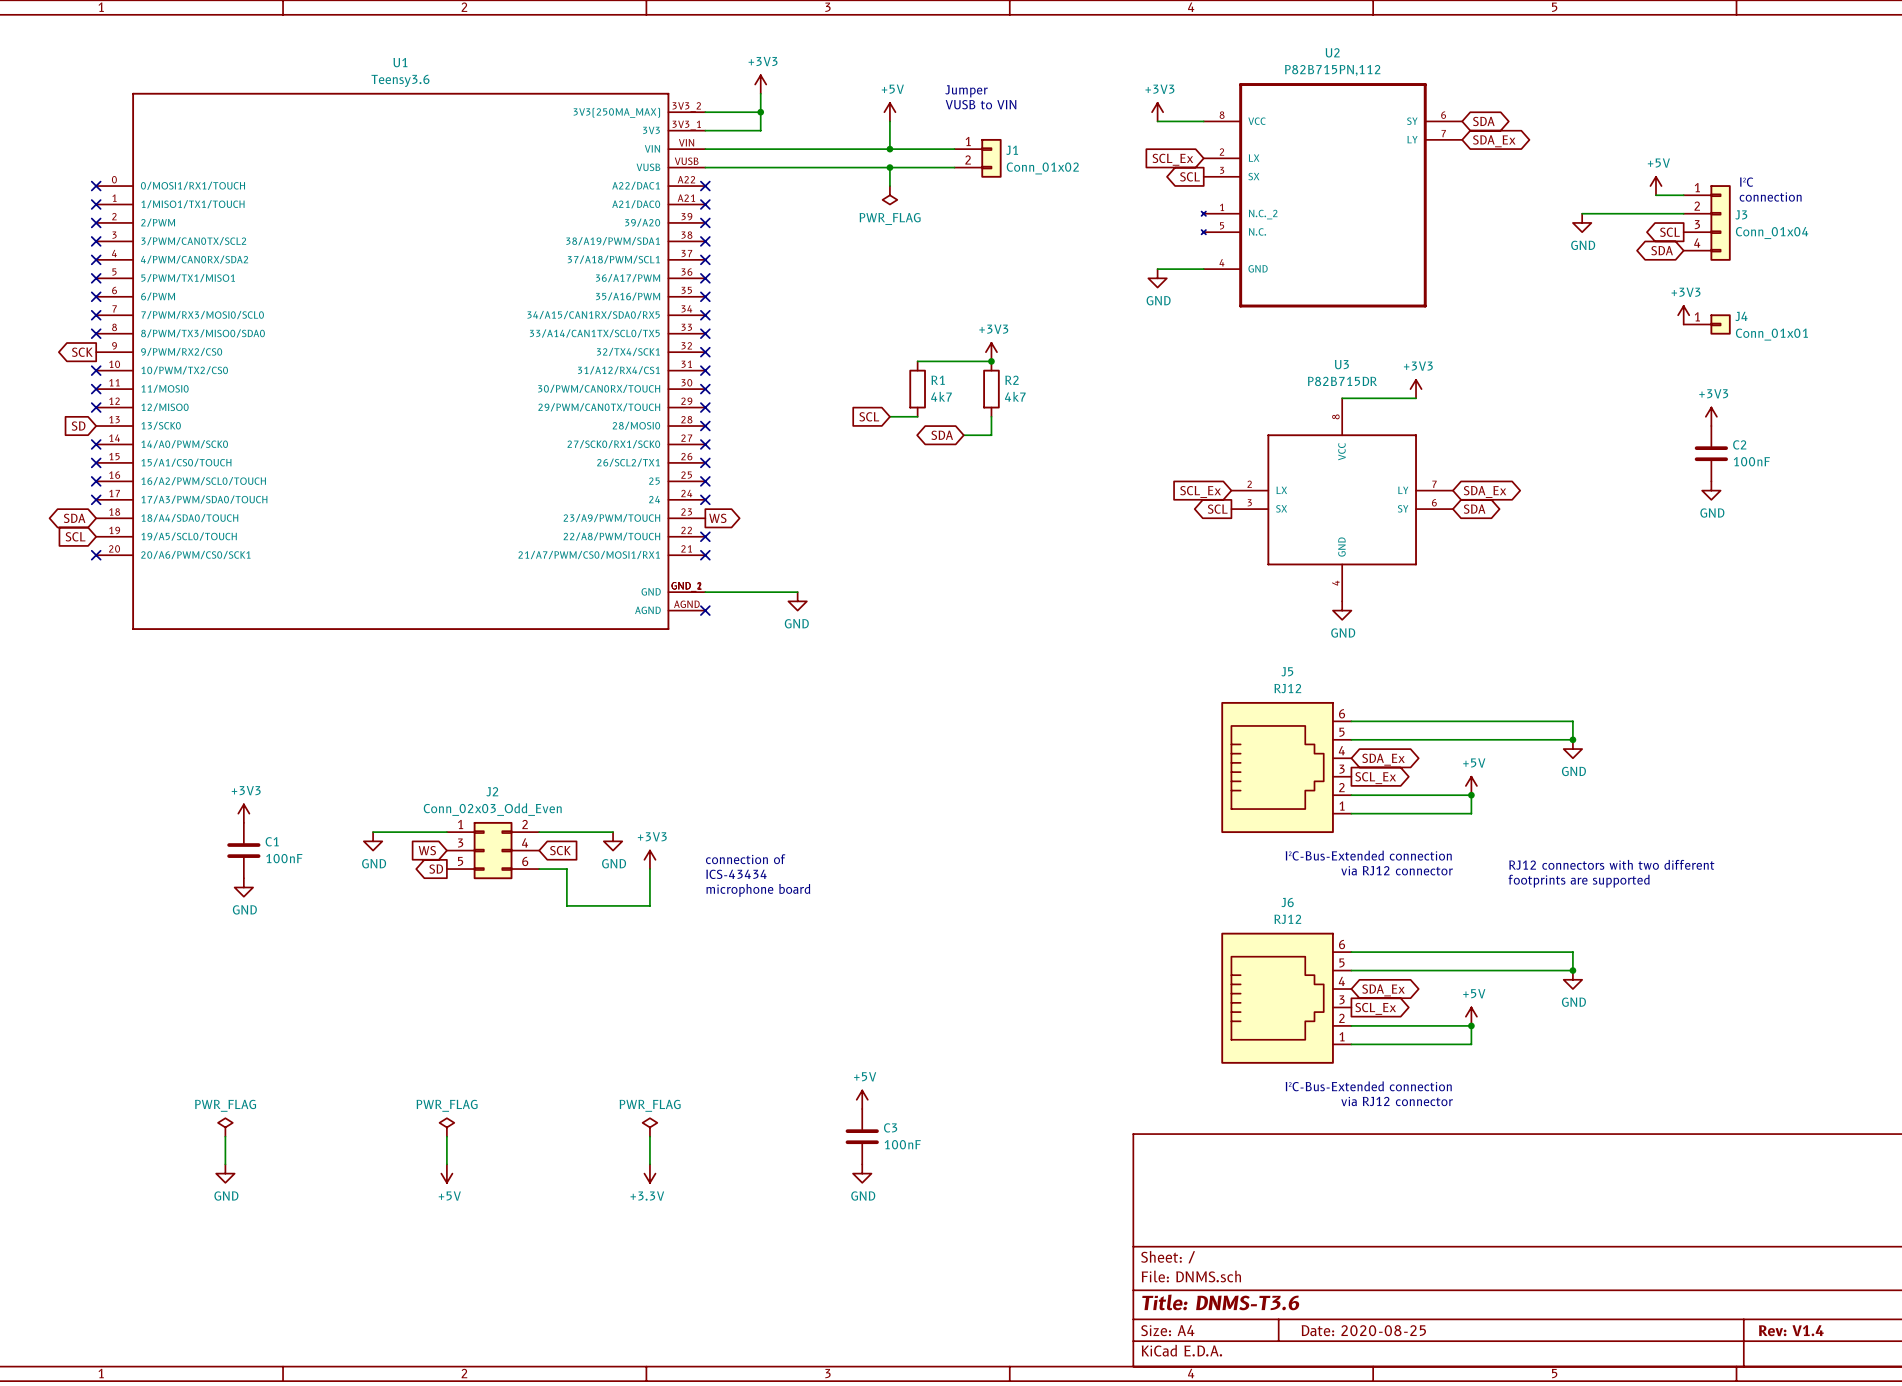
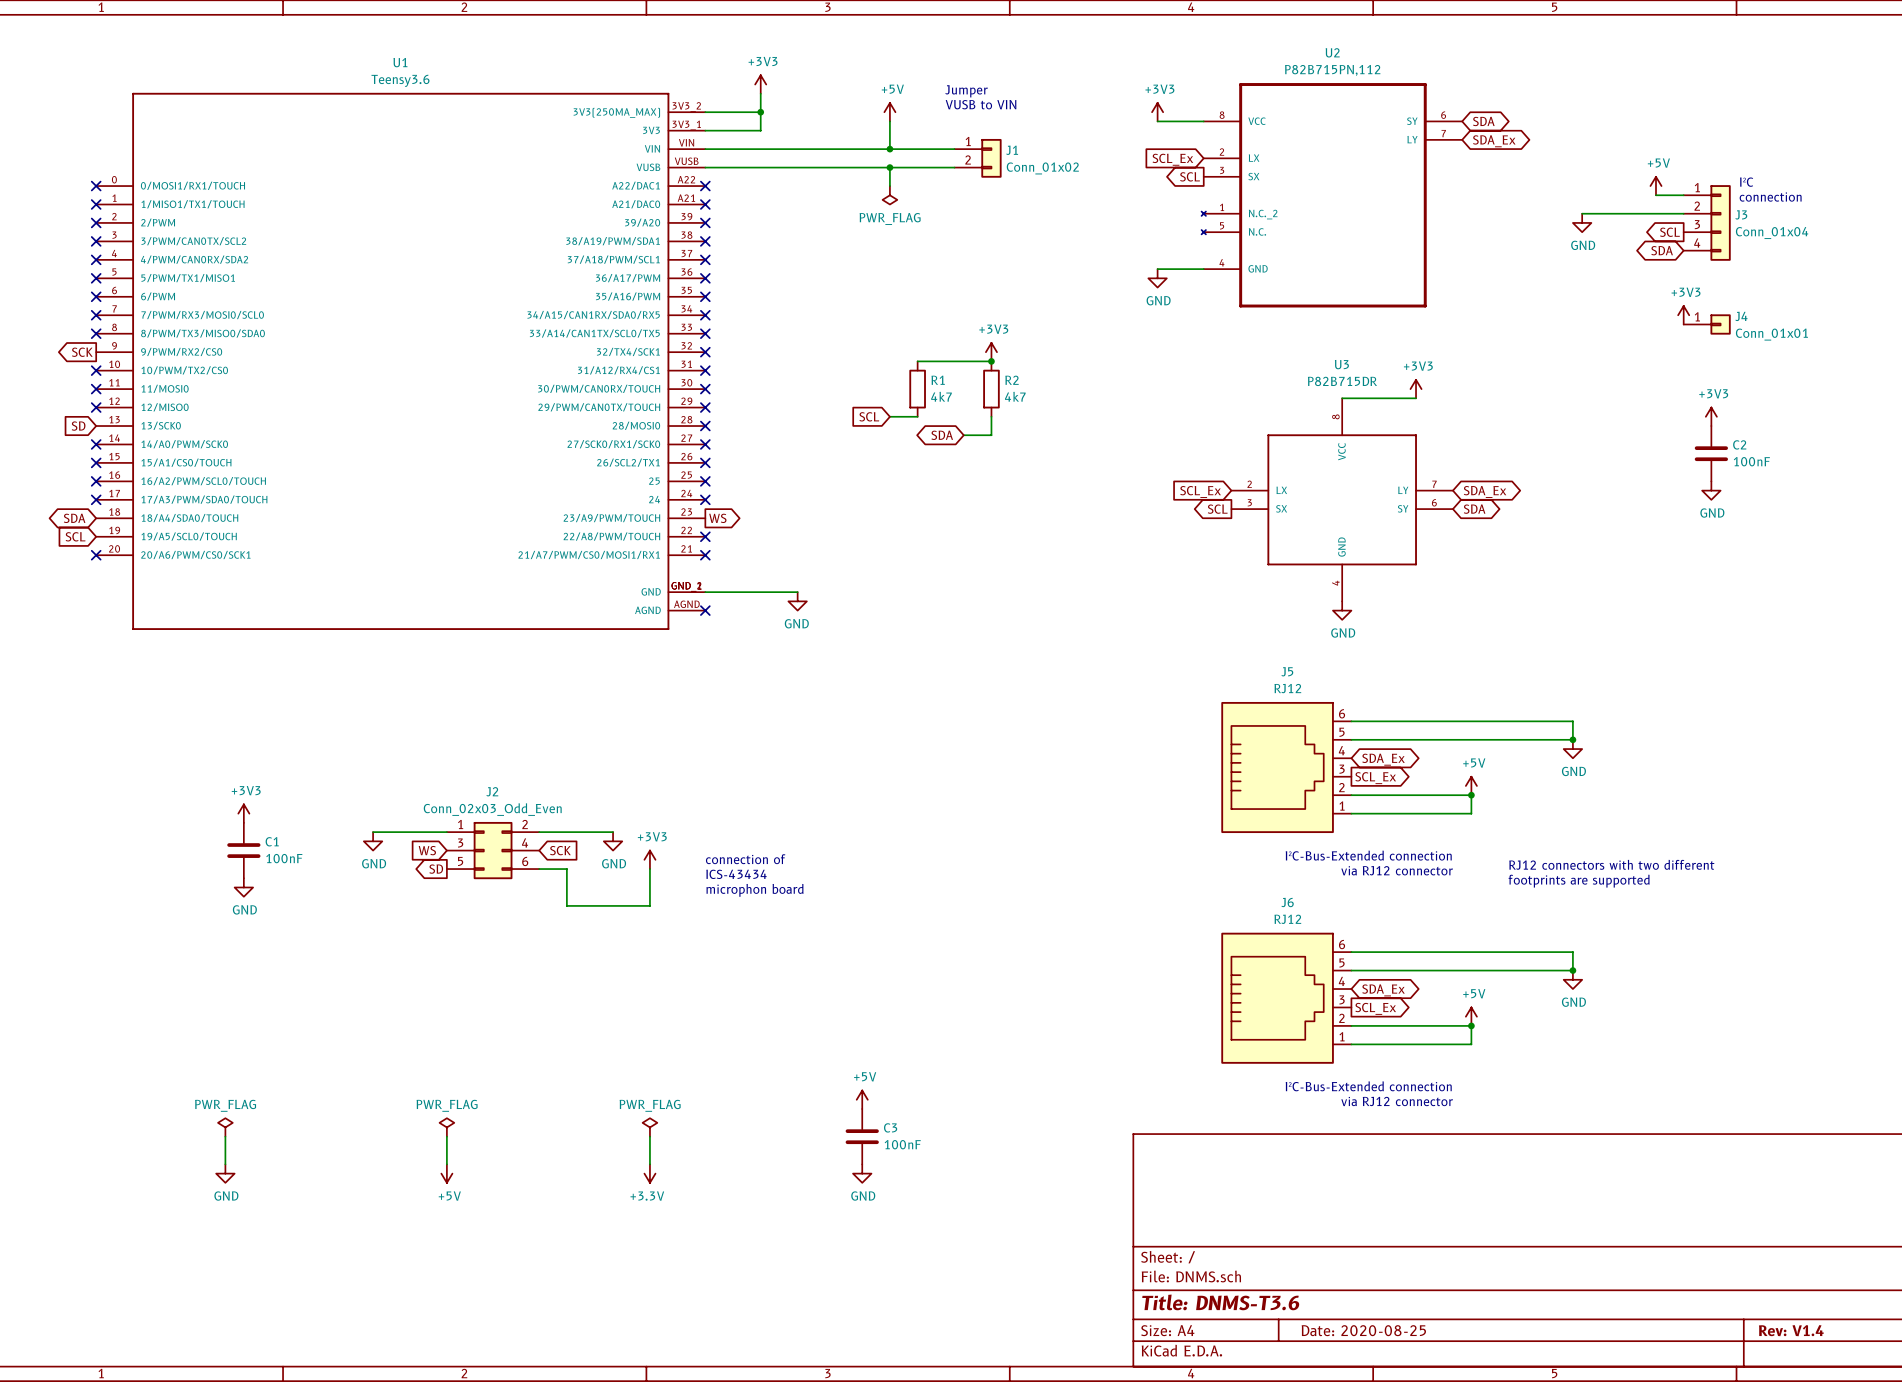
text: microphone board (758, 890) -> microphon board (755, 890)

